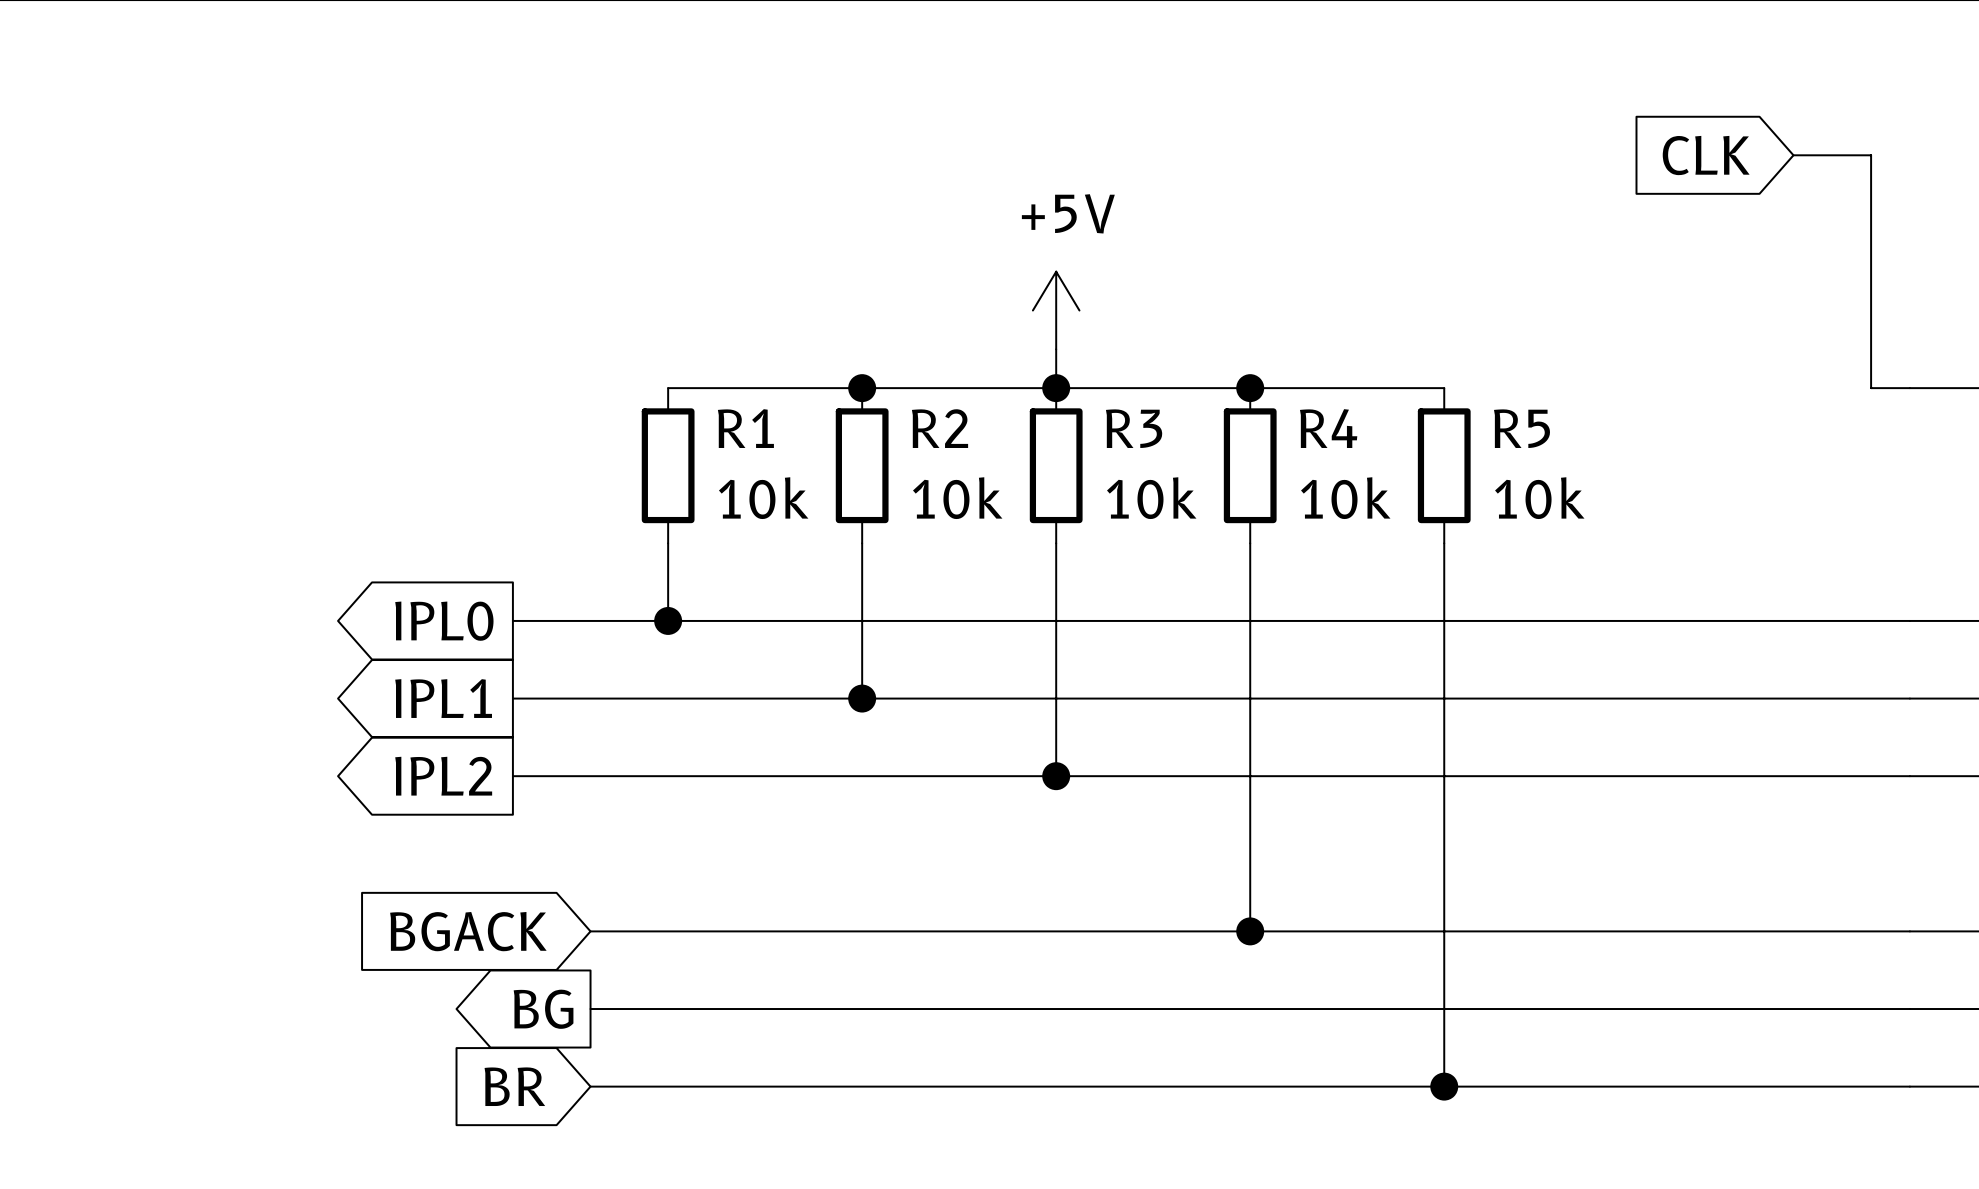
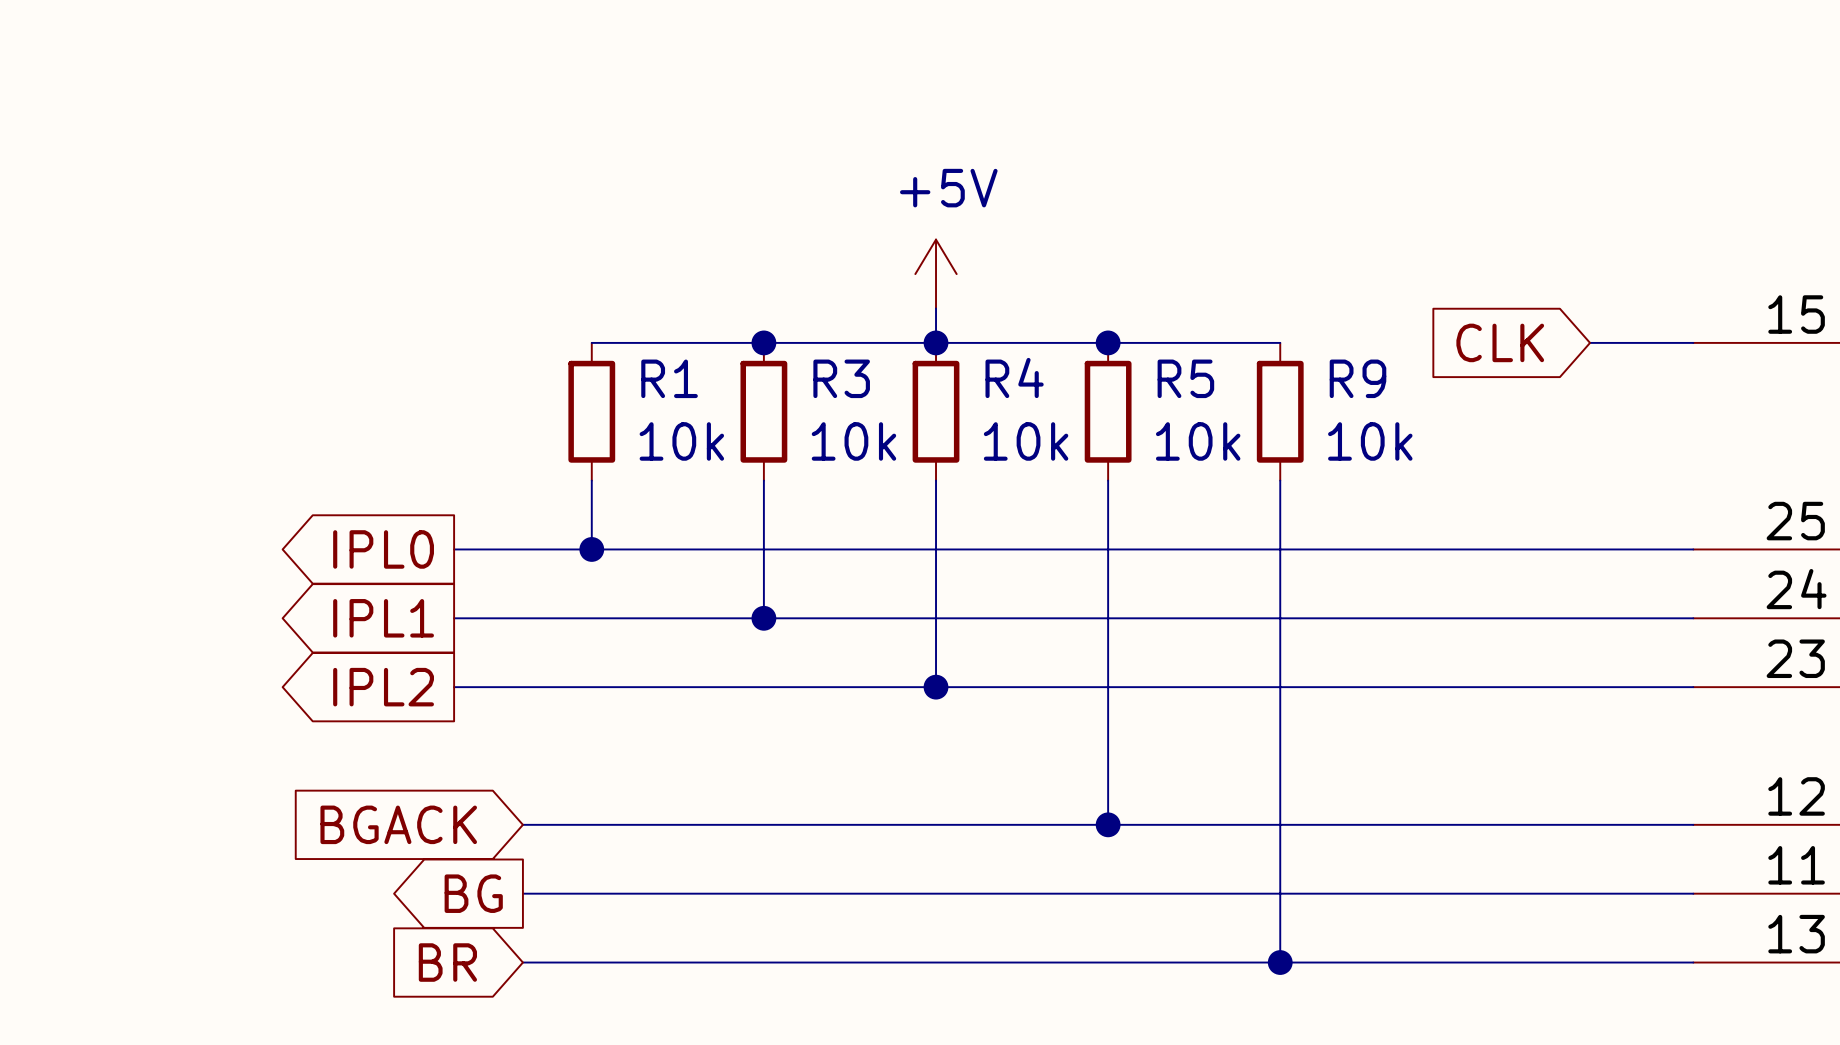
global label position: CLK (1706, 155) -> CLK (1500, 342)
wire: (1793, 155) (1871, 155) (1871, 388) -> (1590, 342) (1658, 342)
R2 name: R2 (940, 428) -> R3 (841, 378)
R3 name: R3 (1134, 428) -> R4 (1014, 377)
R4 name: R4 (1328, 428) -> R5 (1185, 378)
R5 name: R5 (1521, 428) -> R9 (1358, 378)

